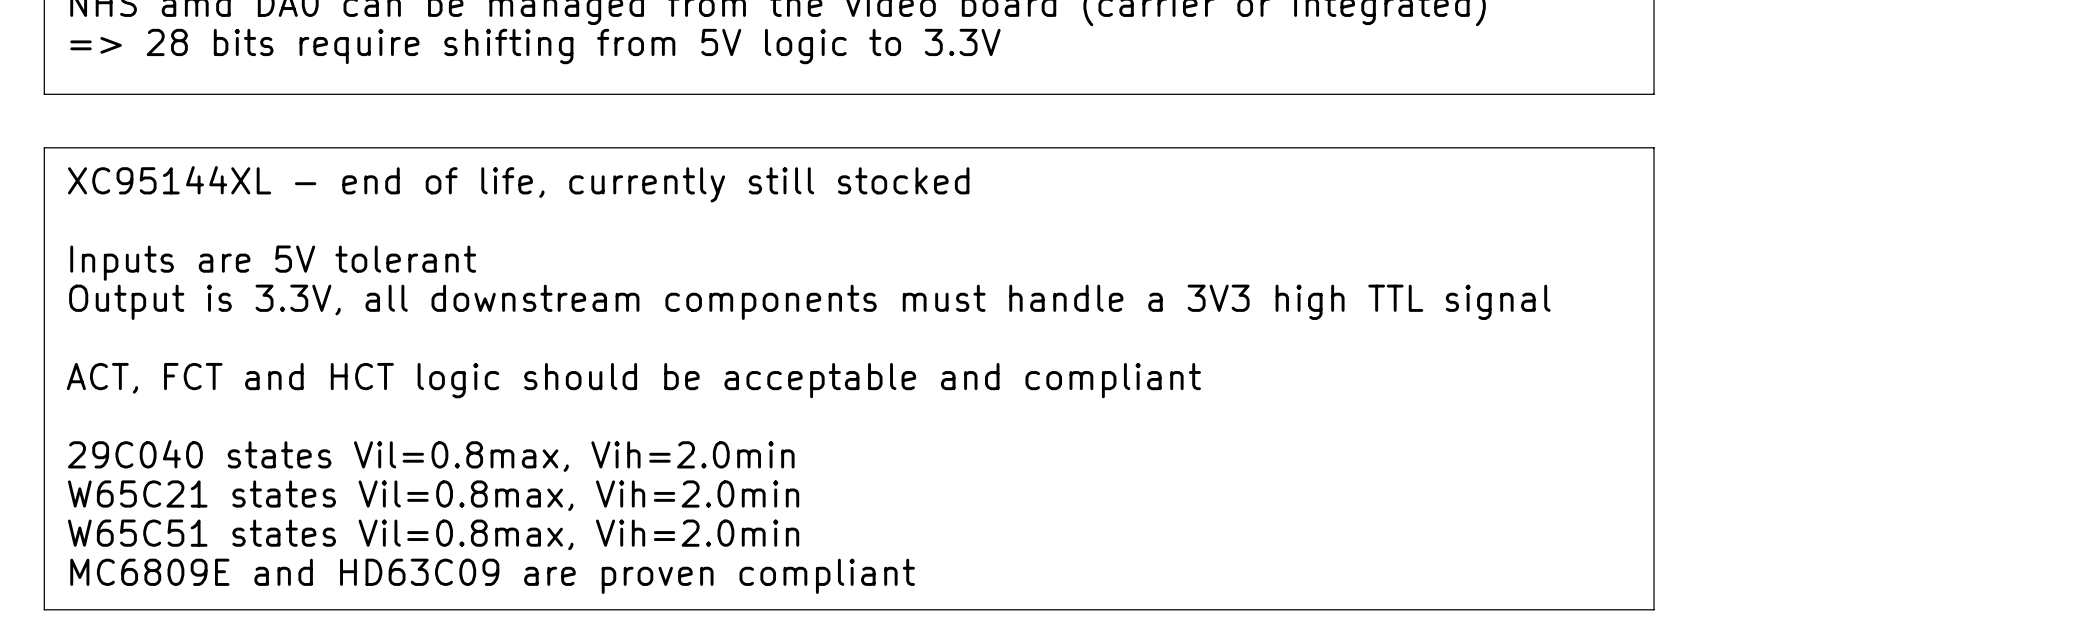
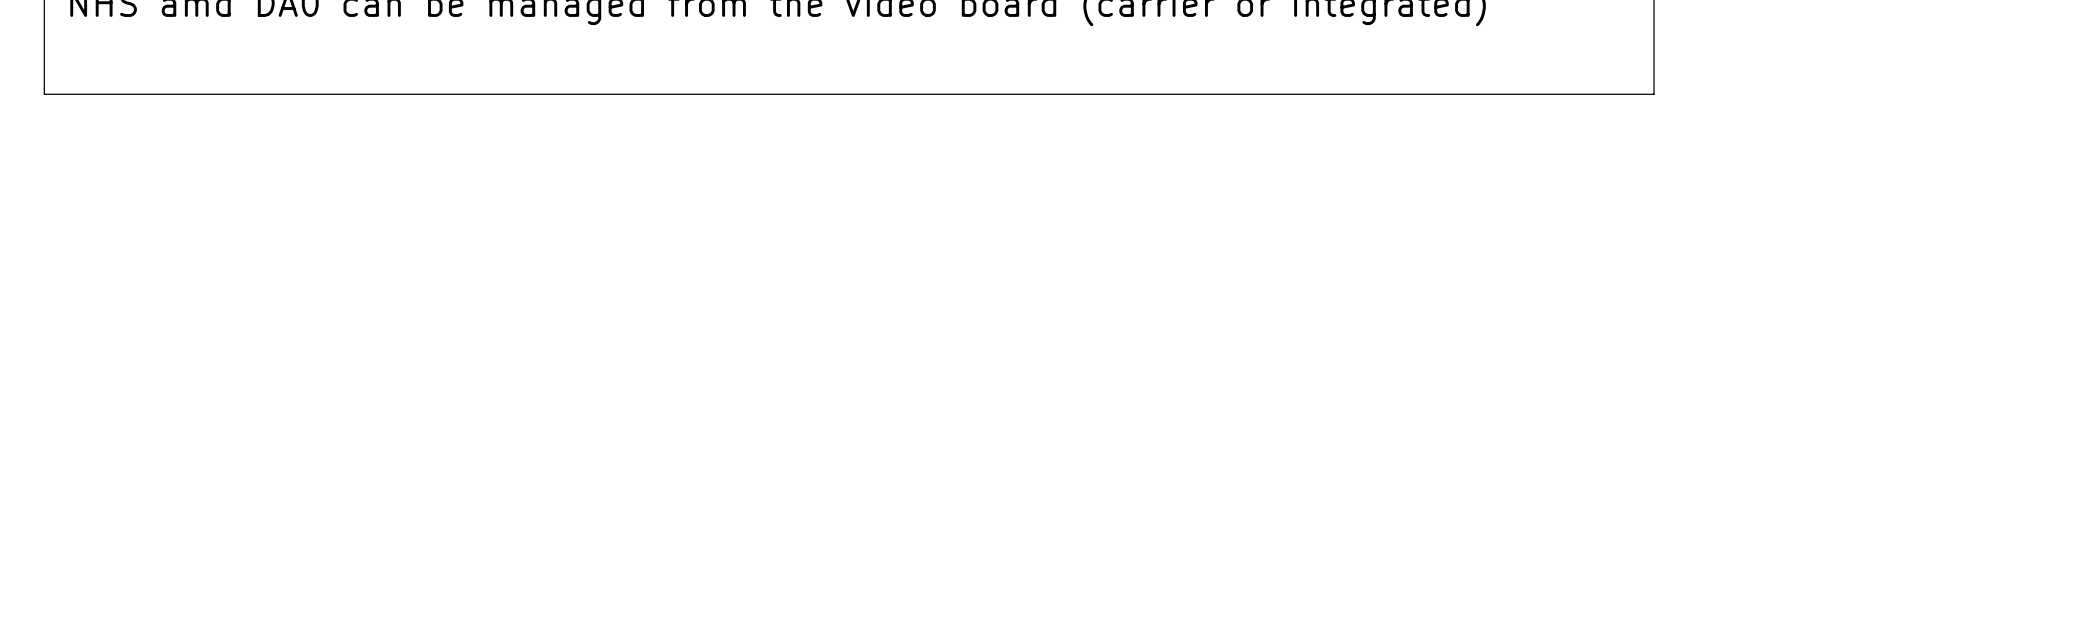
text: => 28 bits require shifting from 5V logic to 3.3V (535, 46) -> none
line: (44, 147) (1654, 147) (1654, 609) (44, 609) (44, 147) -> none
text: XC95144XL - end of life, currently still stocked (518, 184) -> none
text: Inputs are 5V tolerant (273, 263) -> none
text: Output is 3.3V, all downstream components must handle a 3V3 high TTL signal (809, 302) -> none
text: ACT, FCT and HCT logic should be acceptable and compliant (633, 380) -> none
text: 29C040 states Vil=0.8max, Vih=2.0min (431, 456) -> none
text: W65C21 states Vil=0.8max, Vih=2.0min (433, 495) -> none
text: W65C51 states Vil=0.8max, Vih=2.0min (433, 534) -> none
text: MC6809E and HD63C09 are proven compliant (492, 576) -> none

